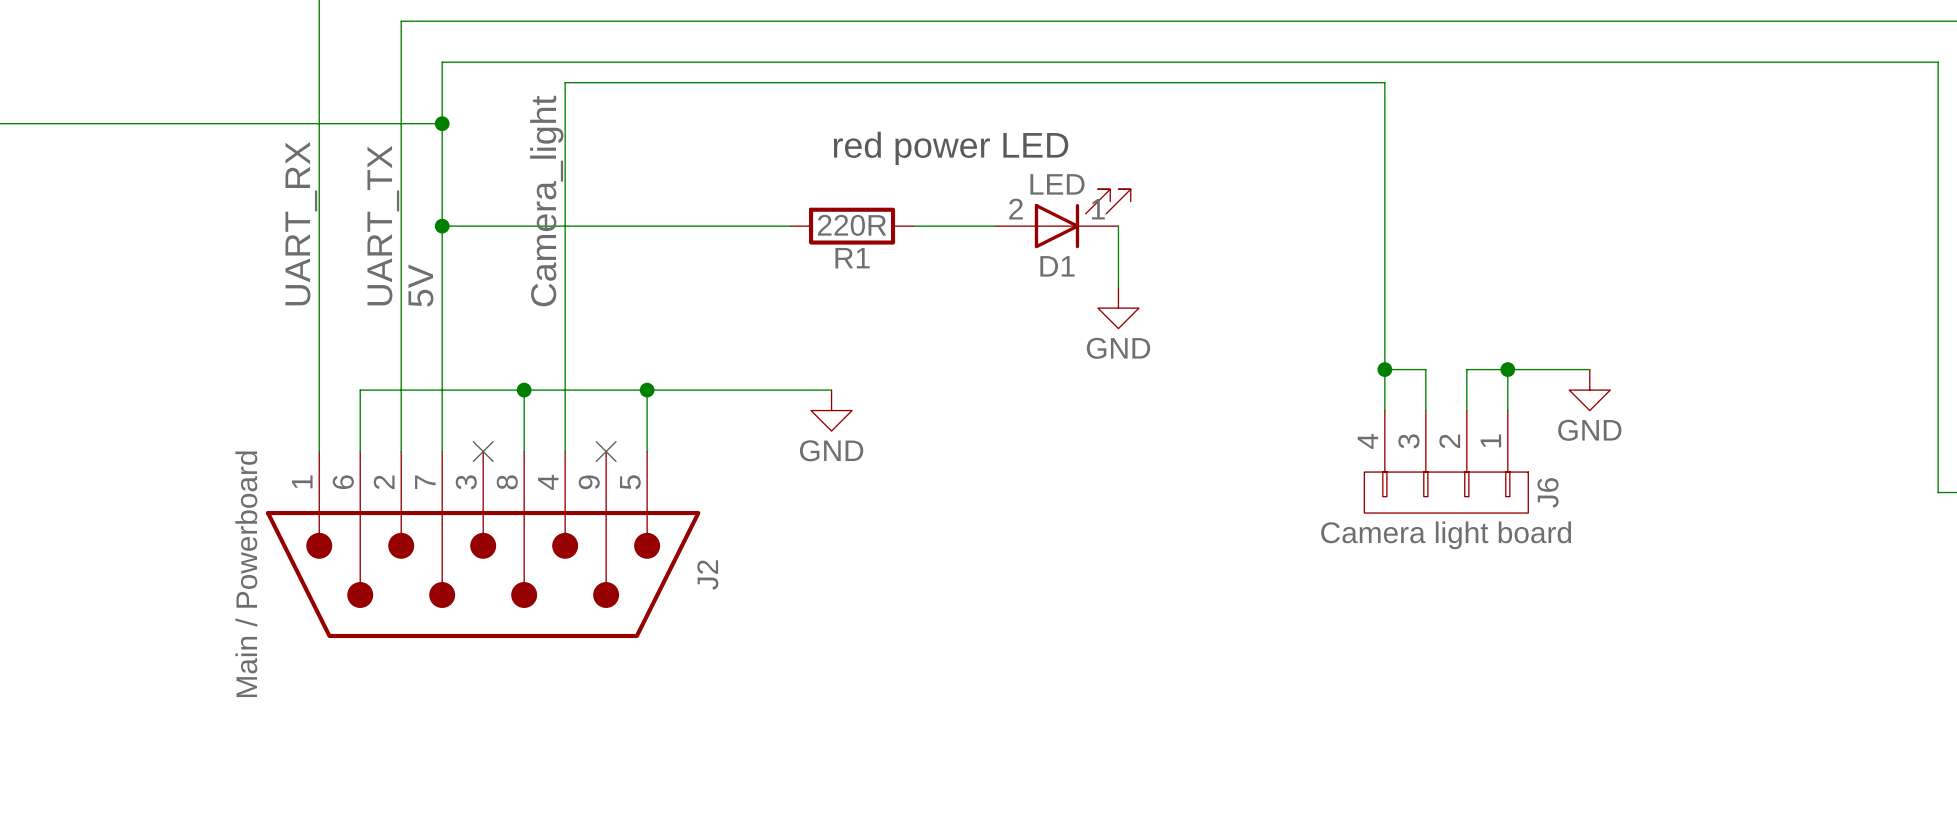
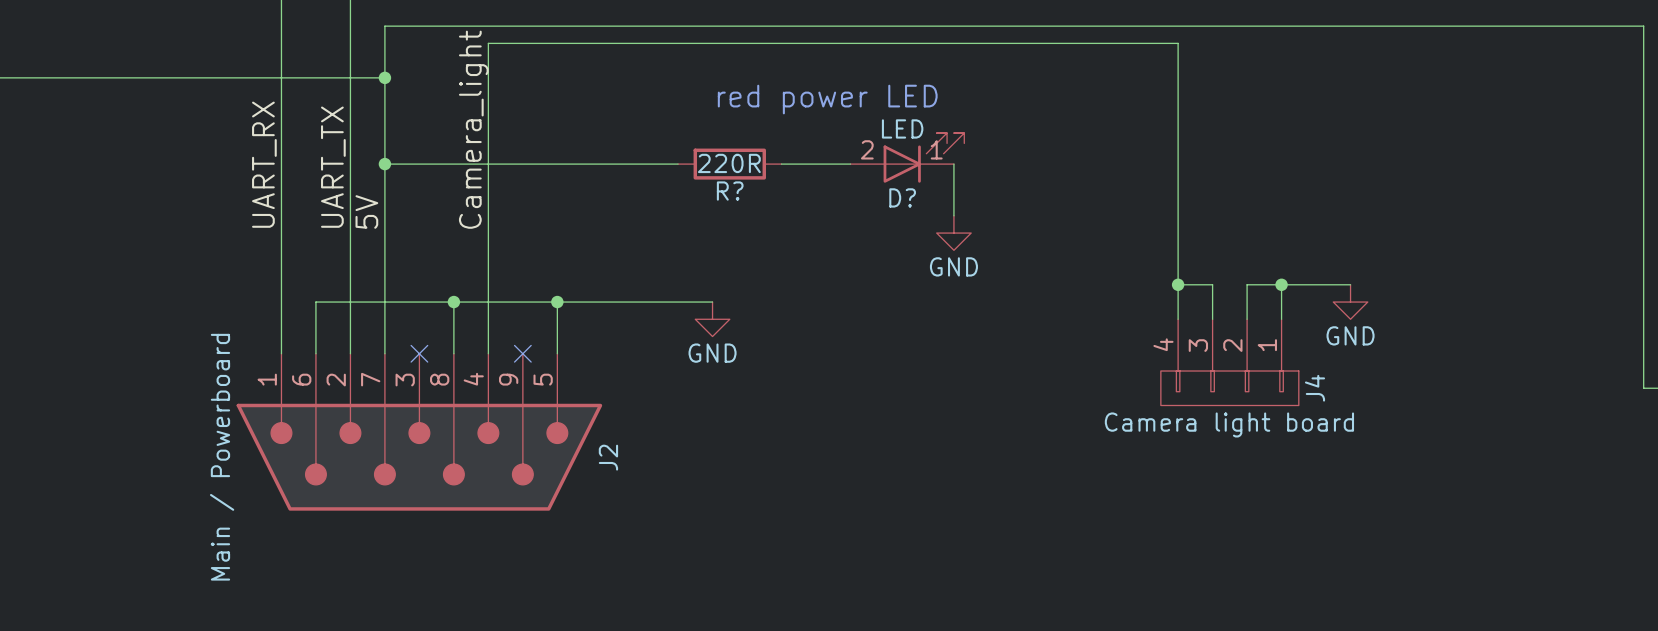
R1 name: R1 (852, 258) -> R? (730, 191)
D1 name: D1 (1057, 266) -> D? (902, 197)
J6 name: J6 (1548, 492) -> J4 (1315, 388)

